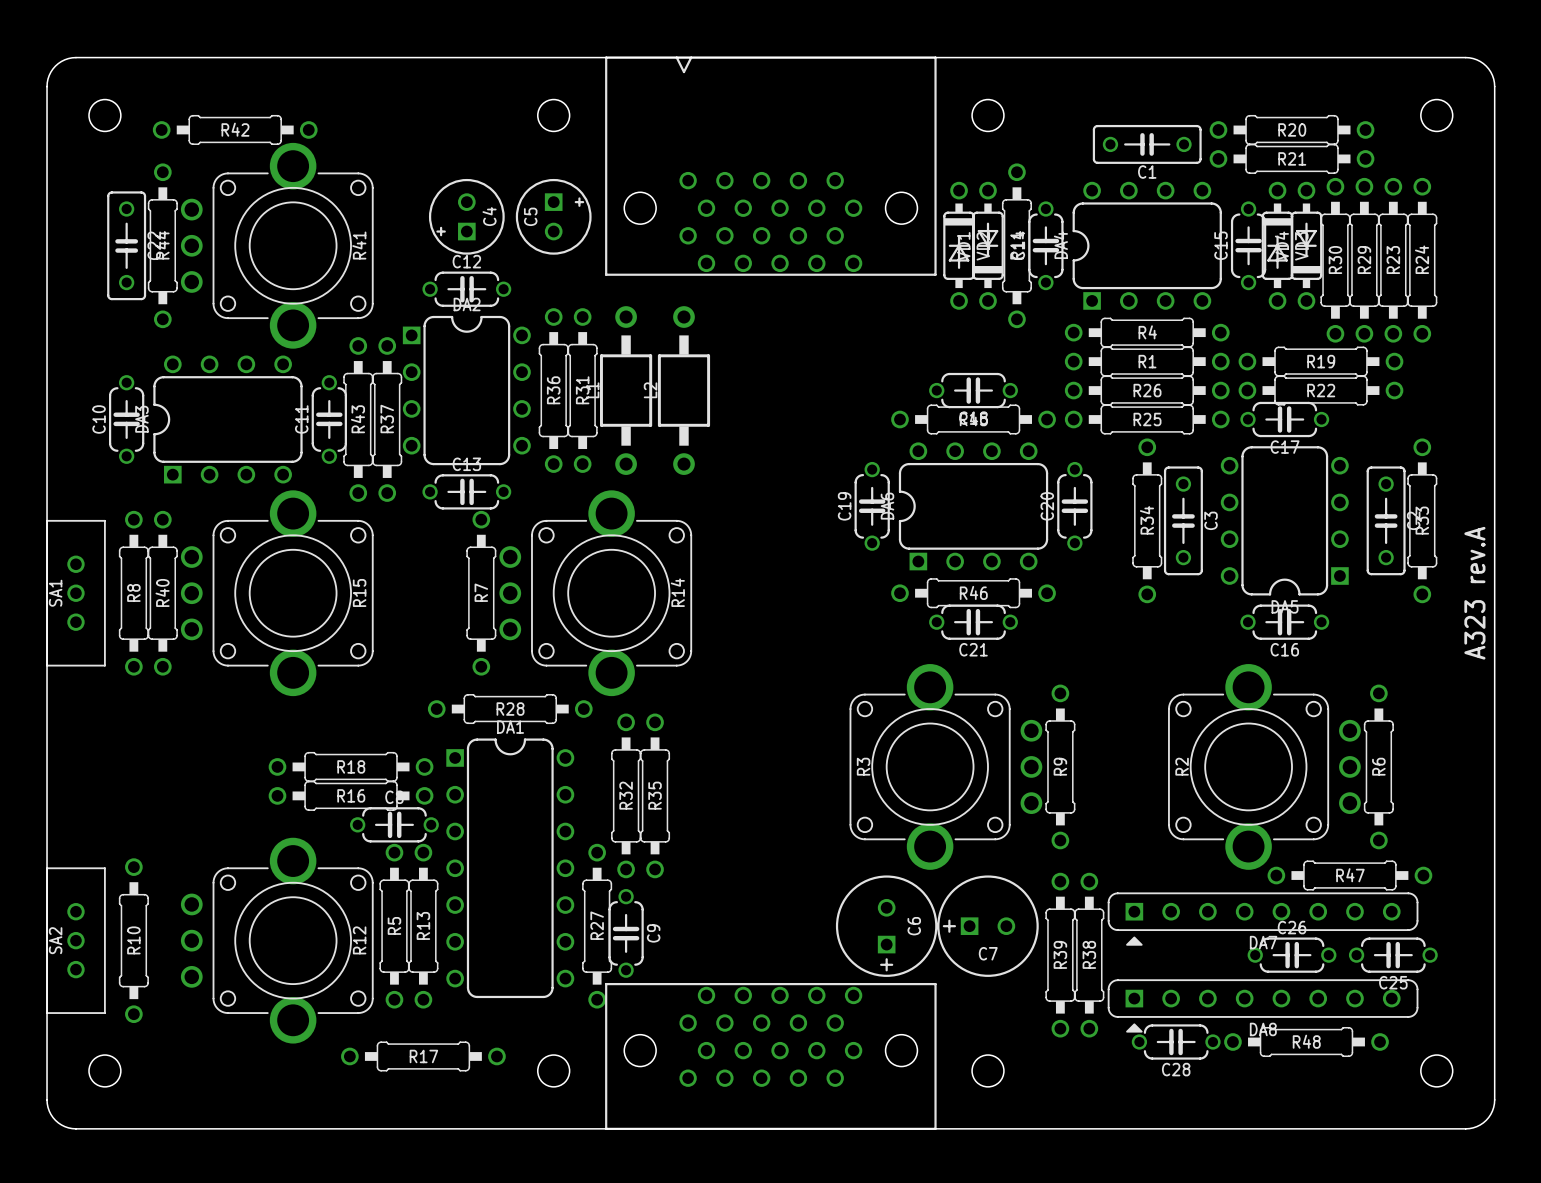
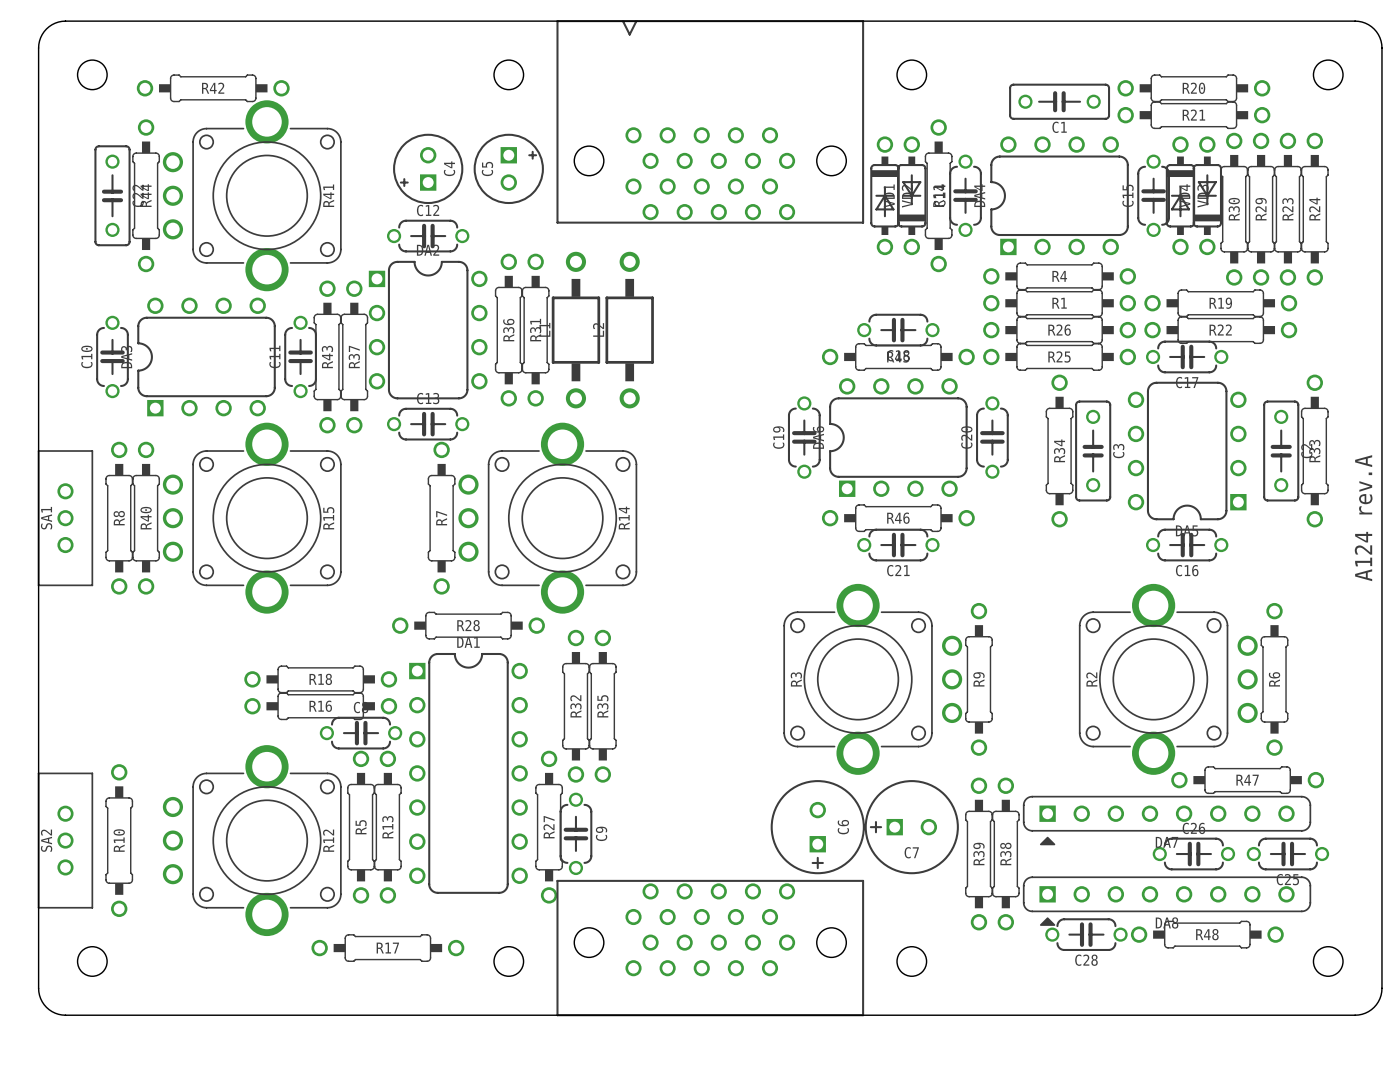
part value: A323 rev.A (1474, 593) -> A124 rev.A (1363, 518)

